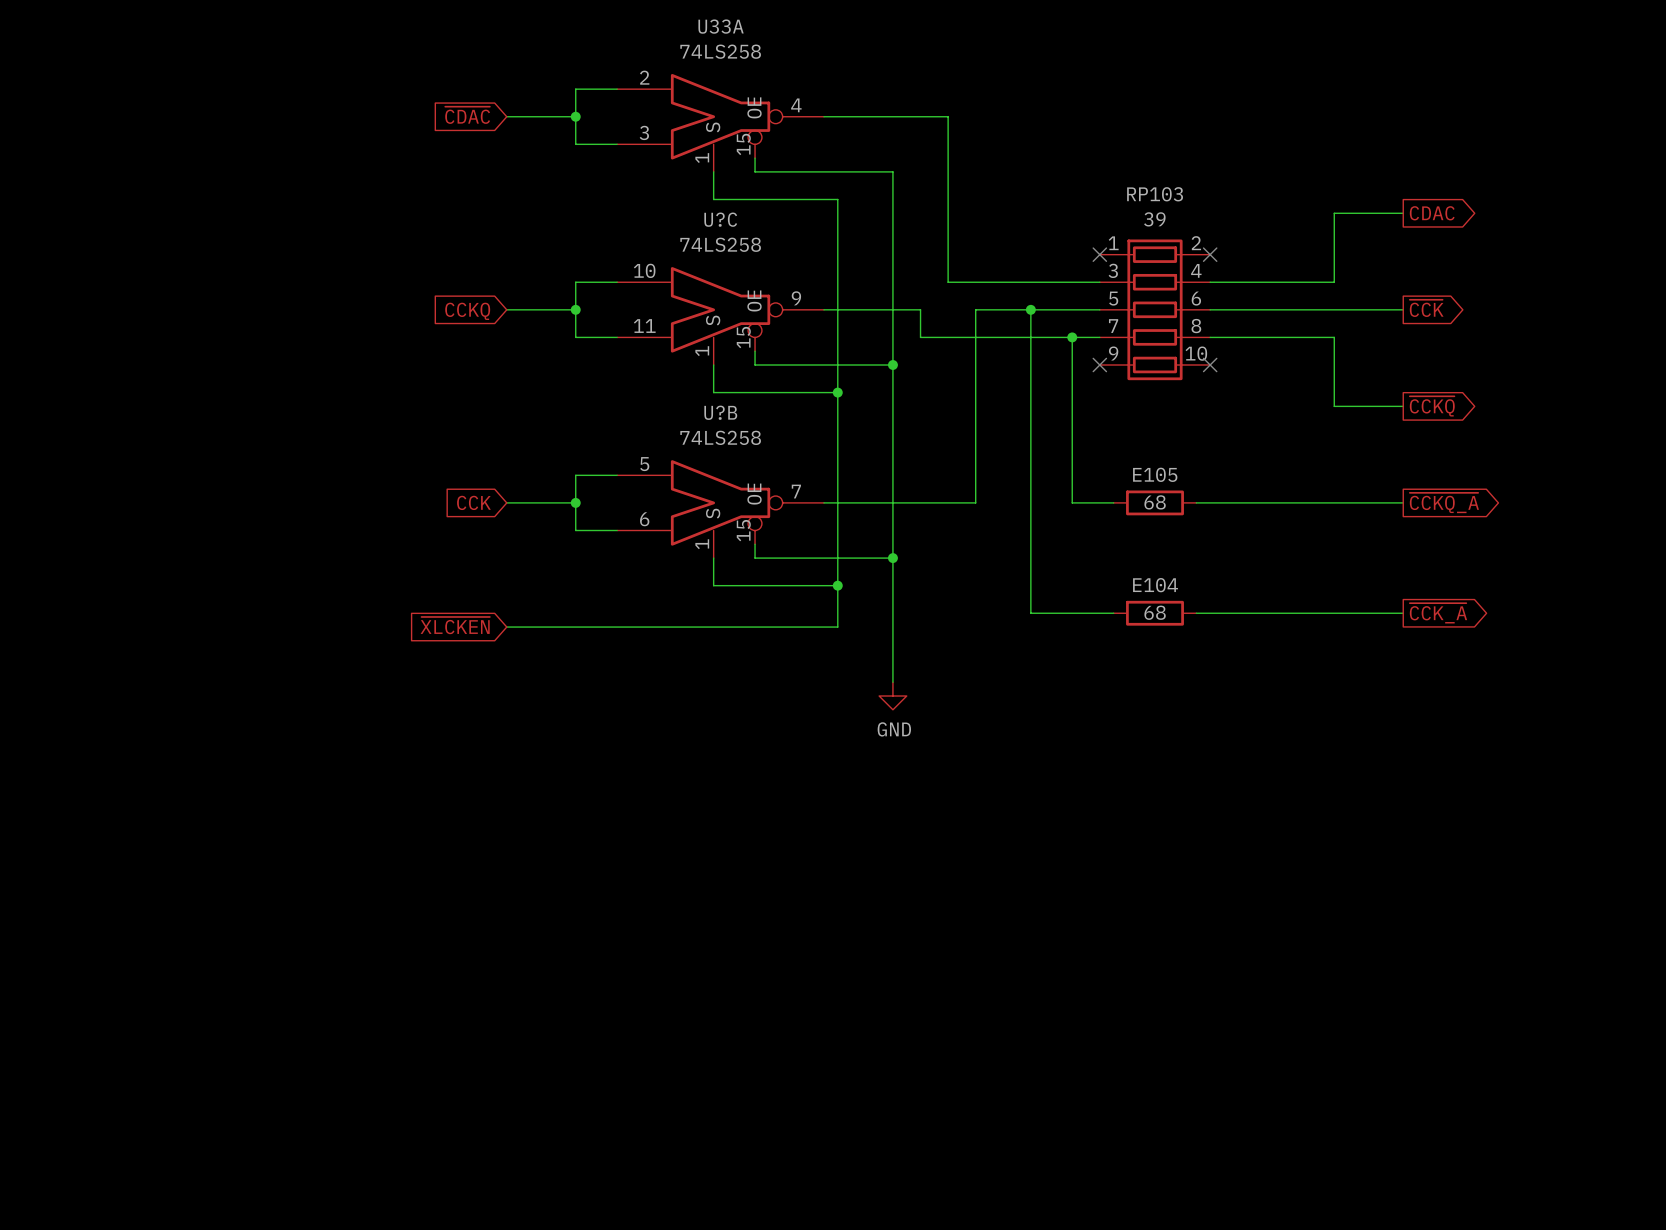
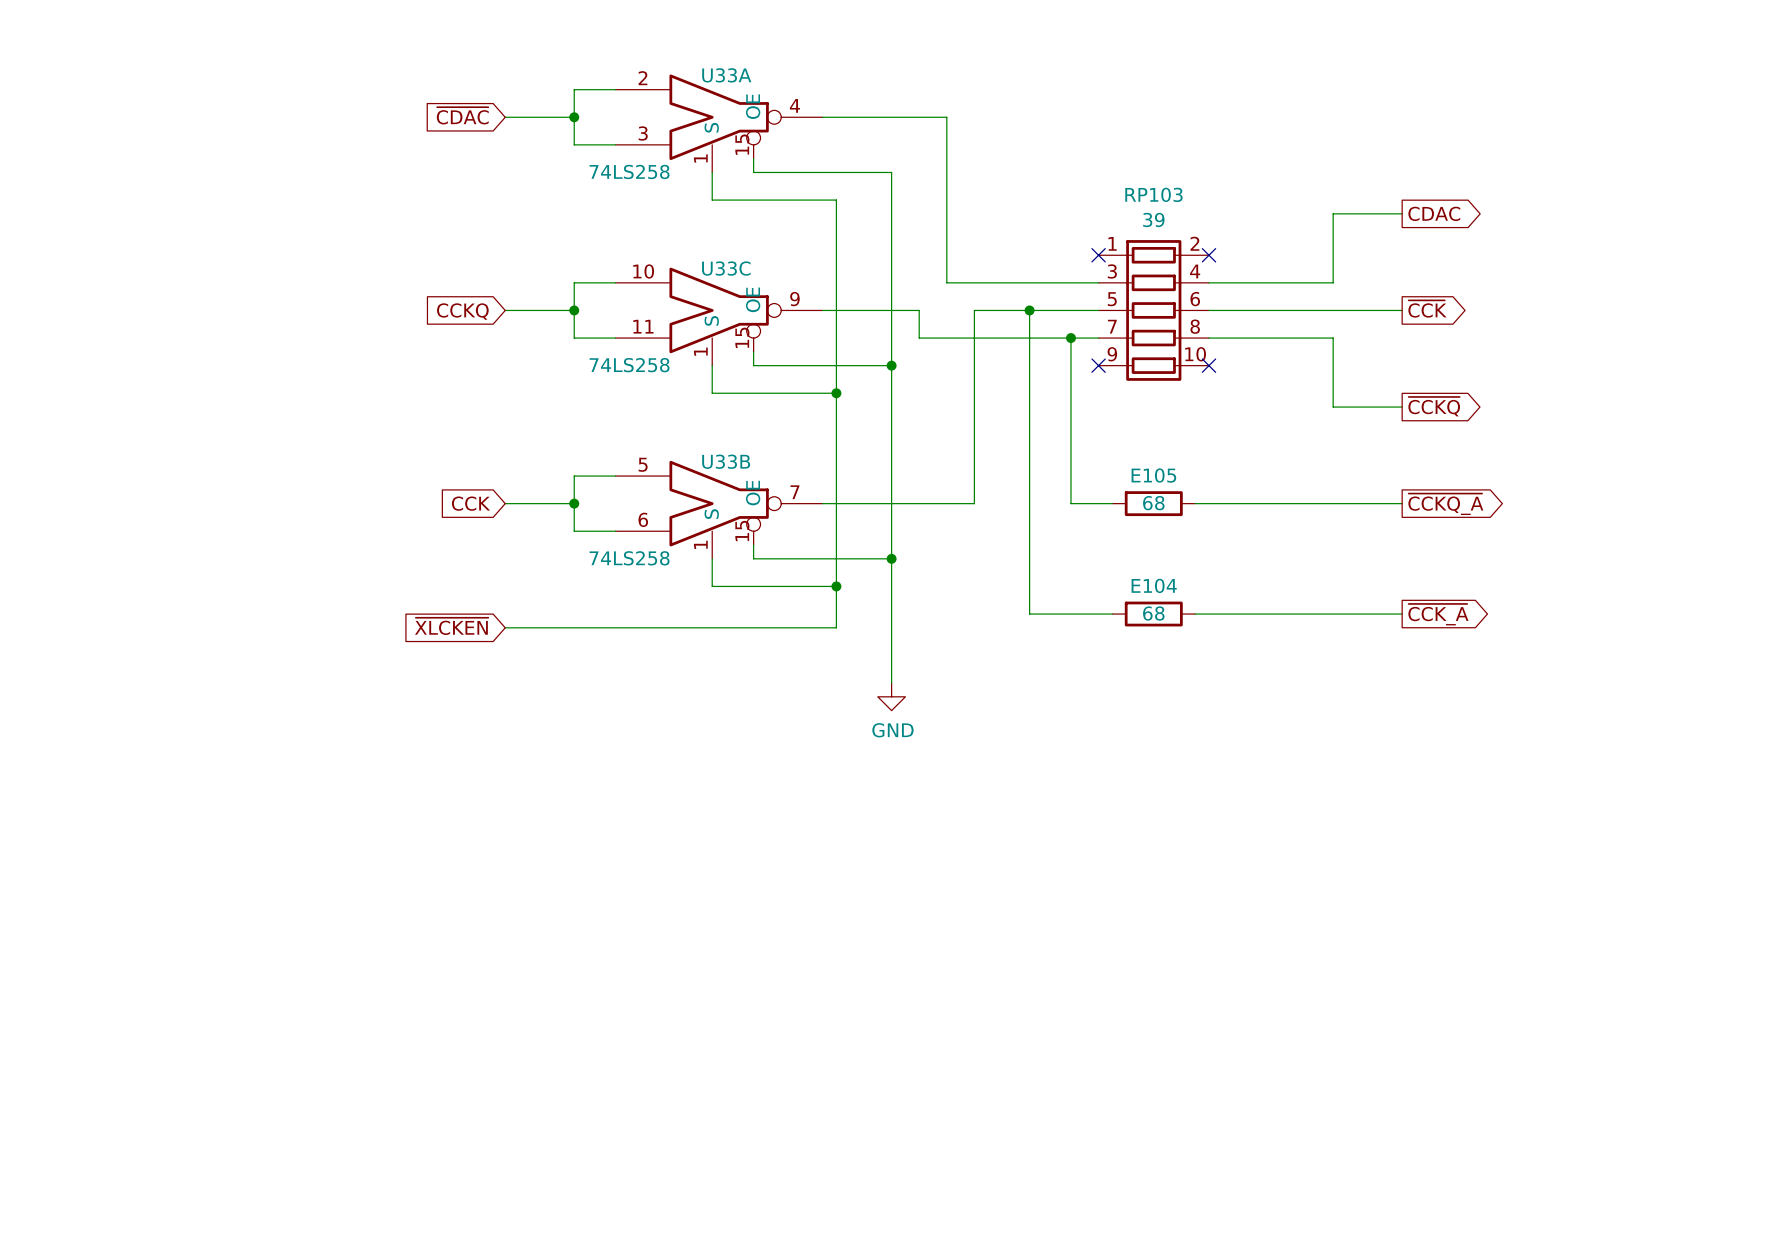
U33A name position: U33A (721, 26) -> U33A (726, 75)
U33A value position: 74LS258 (720, 51) -> 74LS258 (629, 171)
U?C name: U?C (720, 219) -> U33C (726, 268)
U?C value position: 74LS258 (720, 244) -> 74LS258 (629, 365)
U?B name: U?B (720, 412) -> U33B (726, 461)
U?B value position: 74LS258 (720, 437) -> 74LS258 (629, 558)

